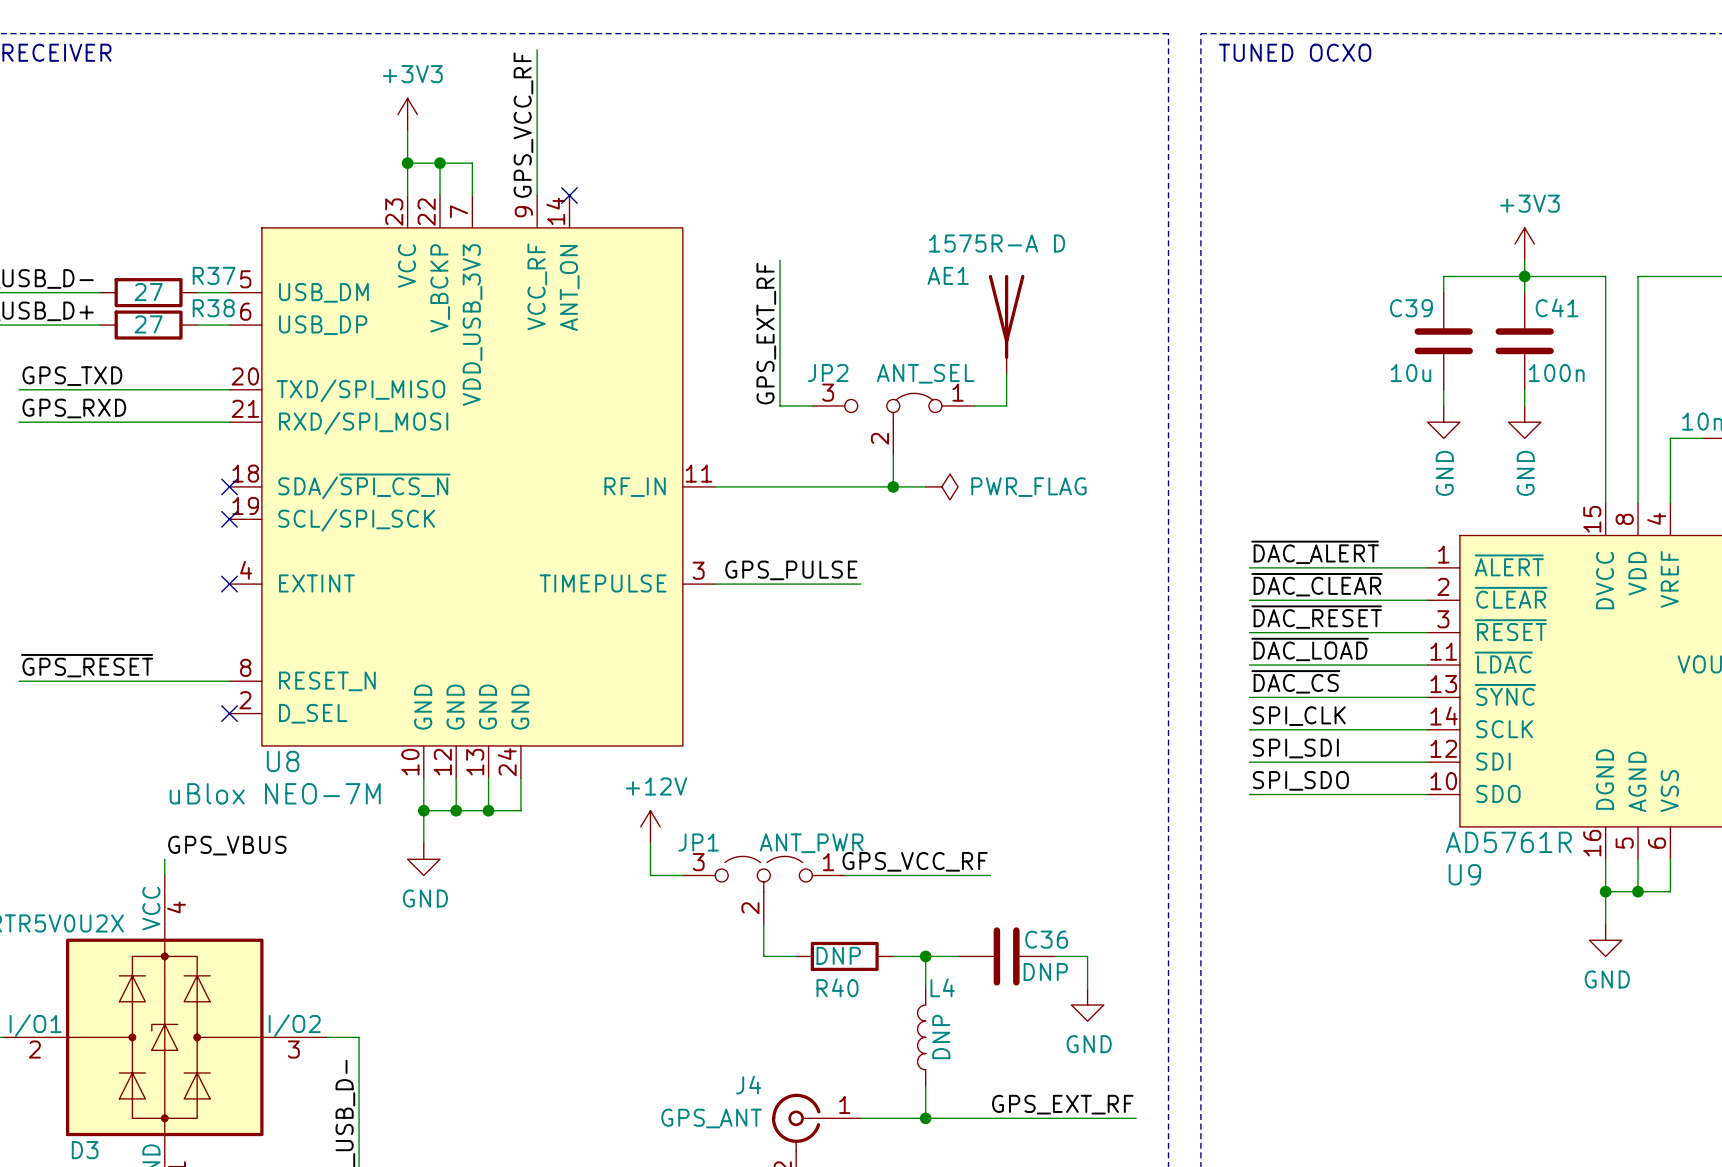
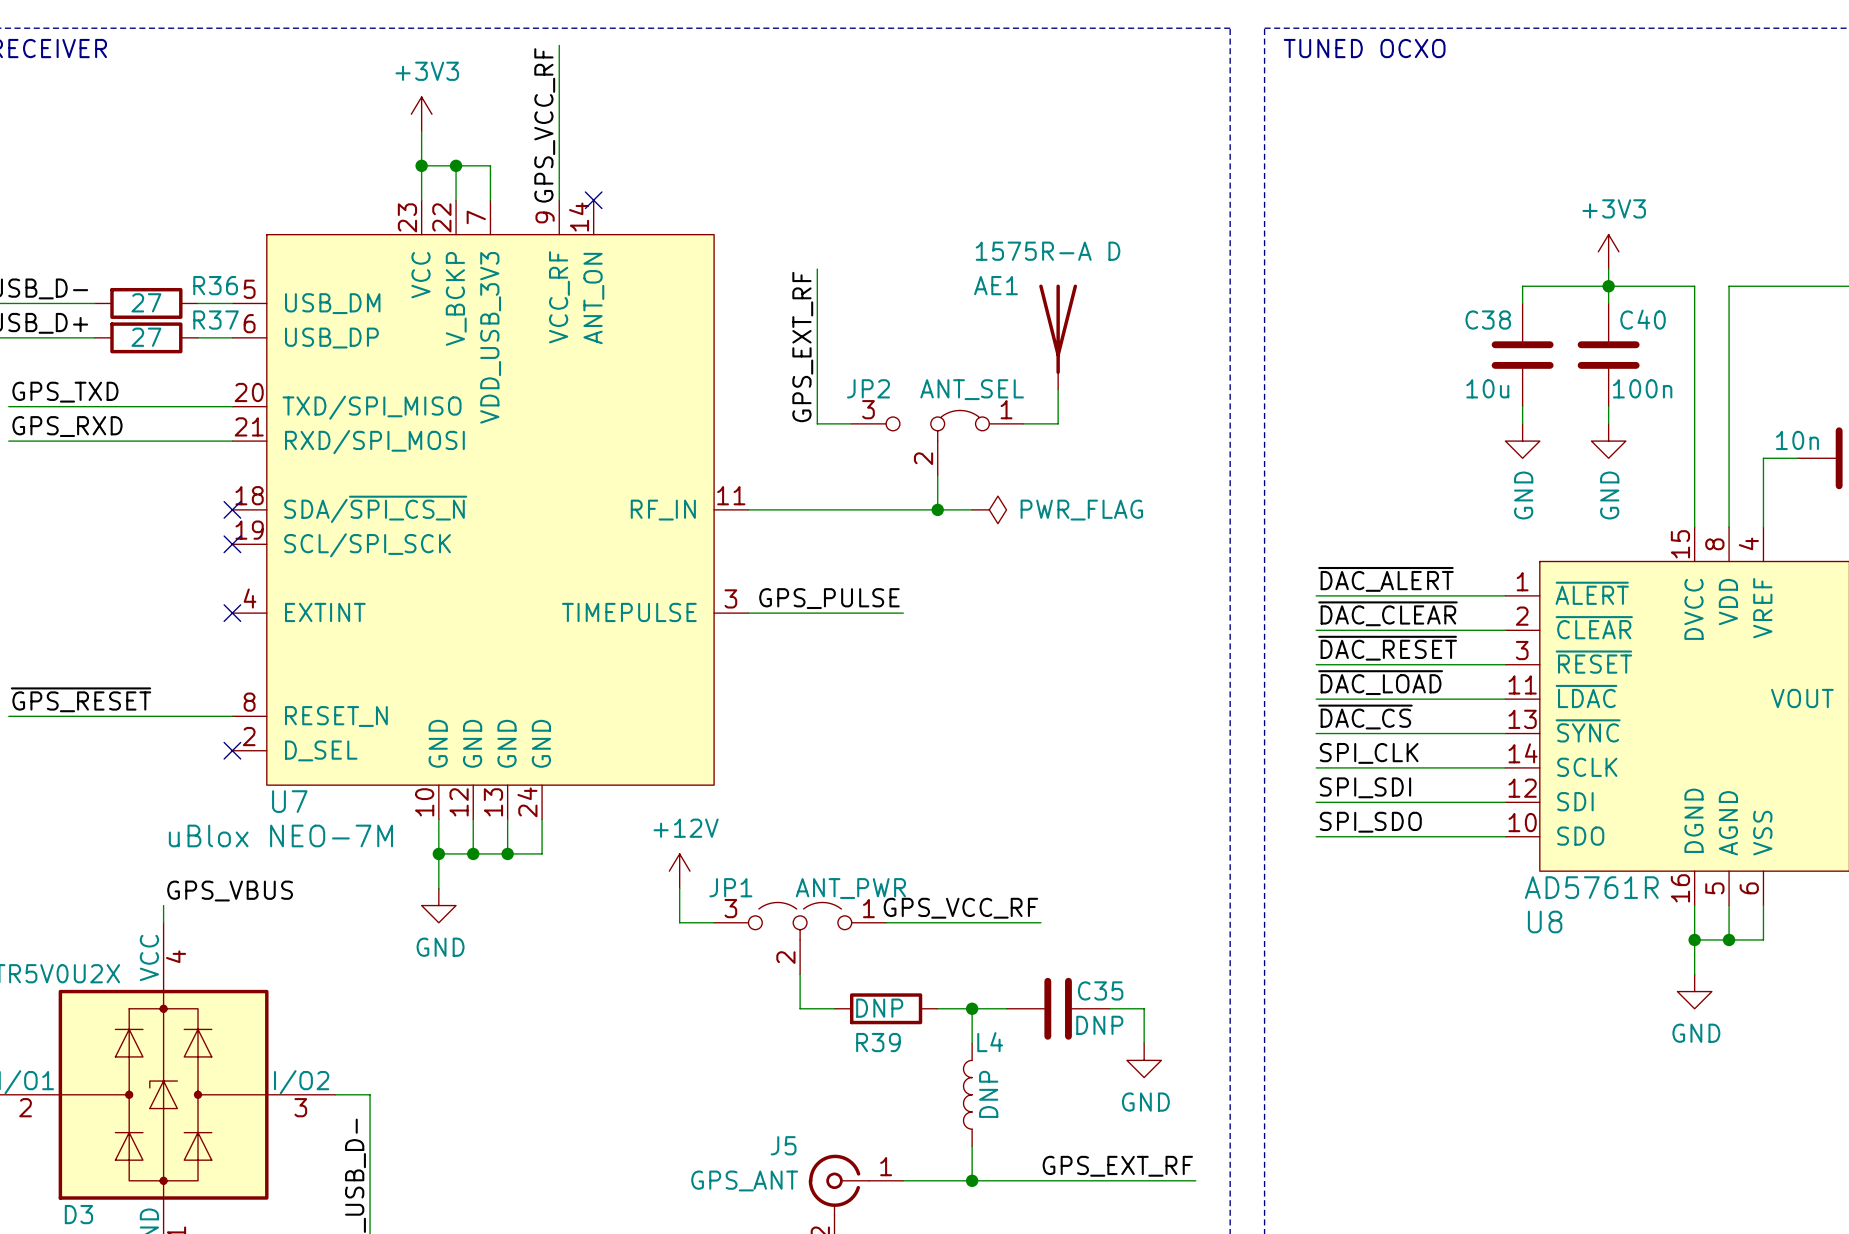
R37 name: R37 (214, 275) -> R36 (215, 285)
C41 name: C41 (1557, 307) -> C40 (1643, 319)
R38 name: R38 (213, 308) -> R37 (216, 320)
C39 name: C39 (1411, 308) -> C38 (1488, 320)
U8 name: U8 (283, 761) -> U7 (289, 801)
U9 name: U9 (1464, 874) -> U8 (1545, 921)
C36 name: C36 (1046, 939) -> C35 (1100, 990)
R40 name: R40 (837, 987) -> R39 (878, 1042)
J4 name: J4 (748, 1084) -> J5 (783, 1145)

